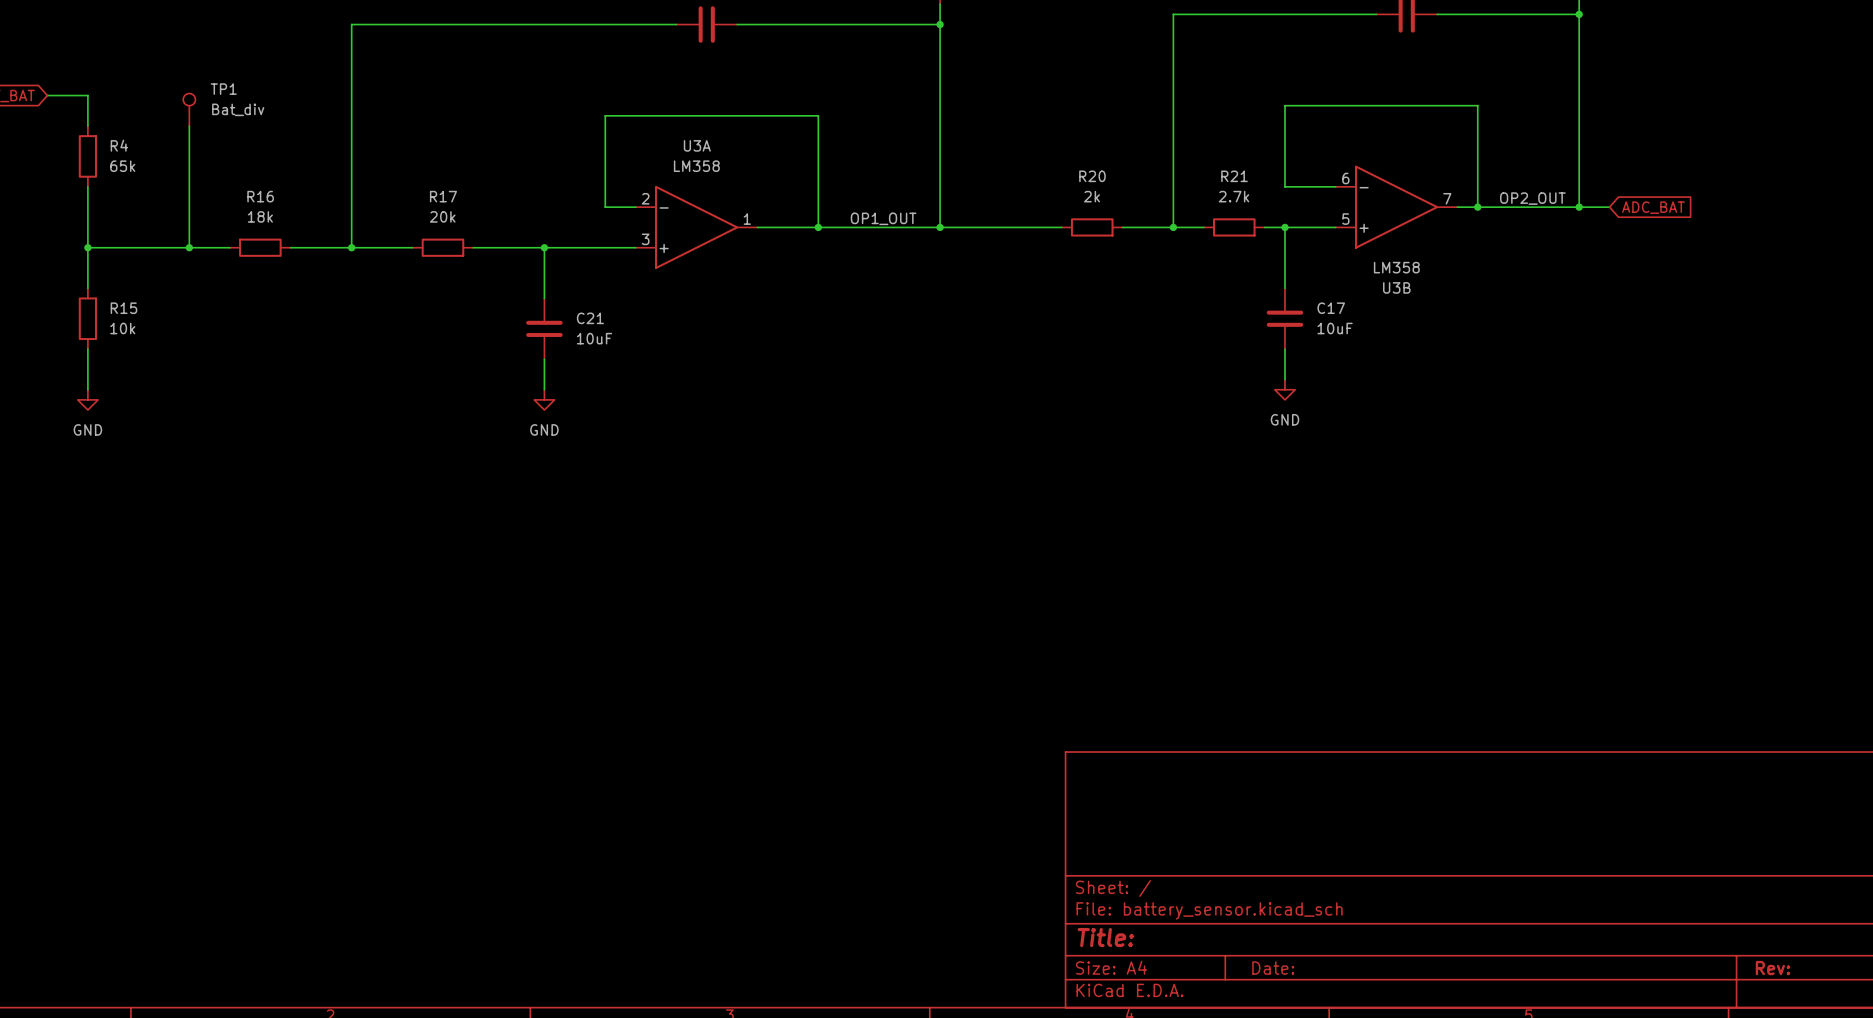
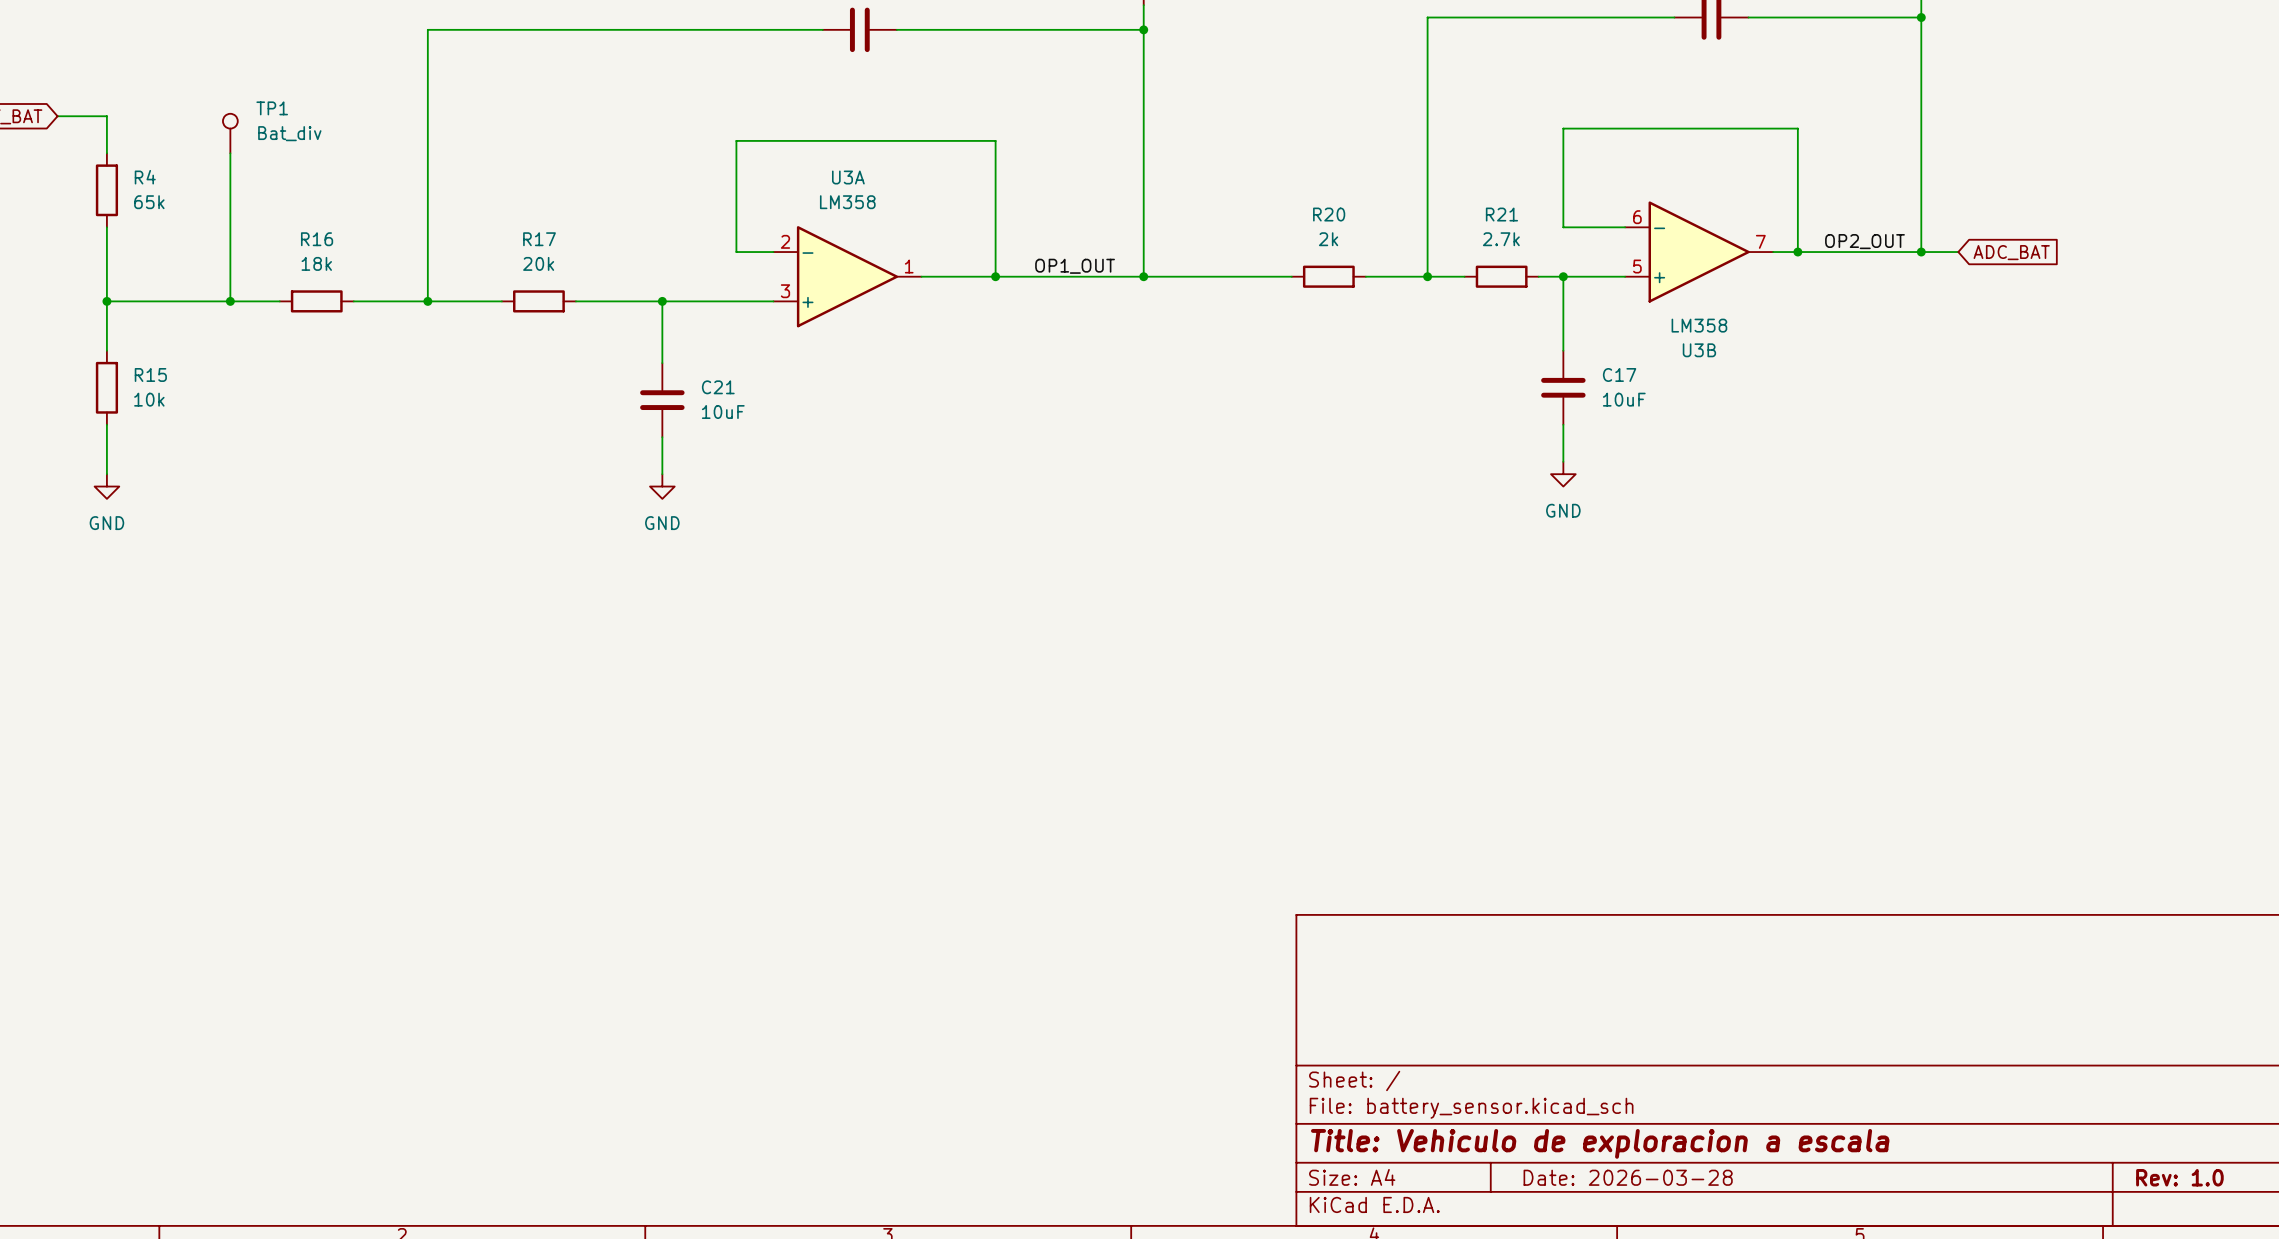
title block: Title: (1105, 937) -> Title: Vehiculo de exploracion a escala (1600, 1143)
title block: Date: (1273, 968) -> Date: 2026-03-28 (1628, 1177)
title block: Rev: (1772, 968) -> Rev: 1.0 (2179, 1177)

